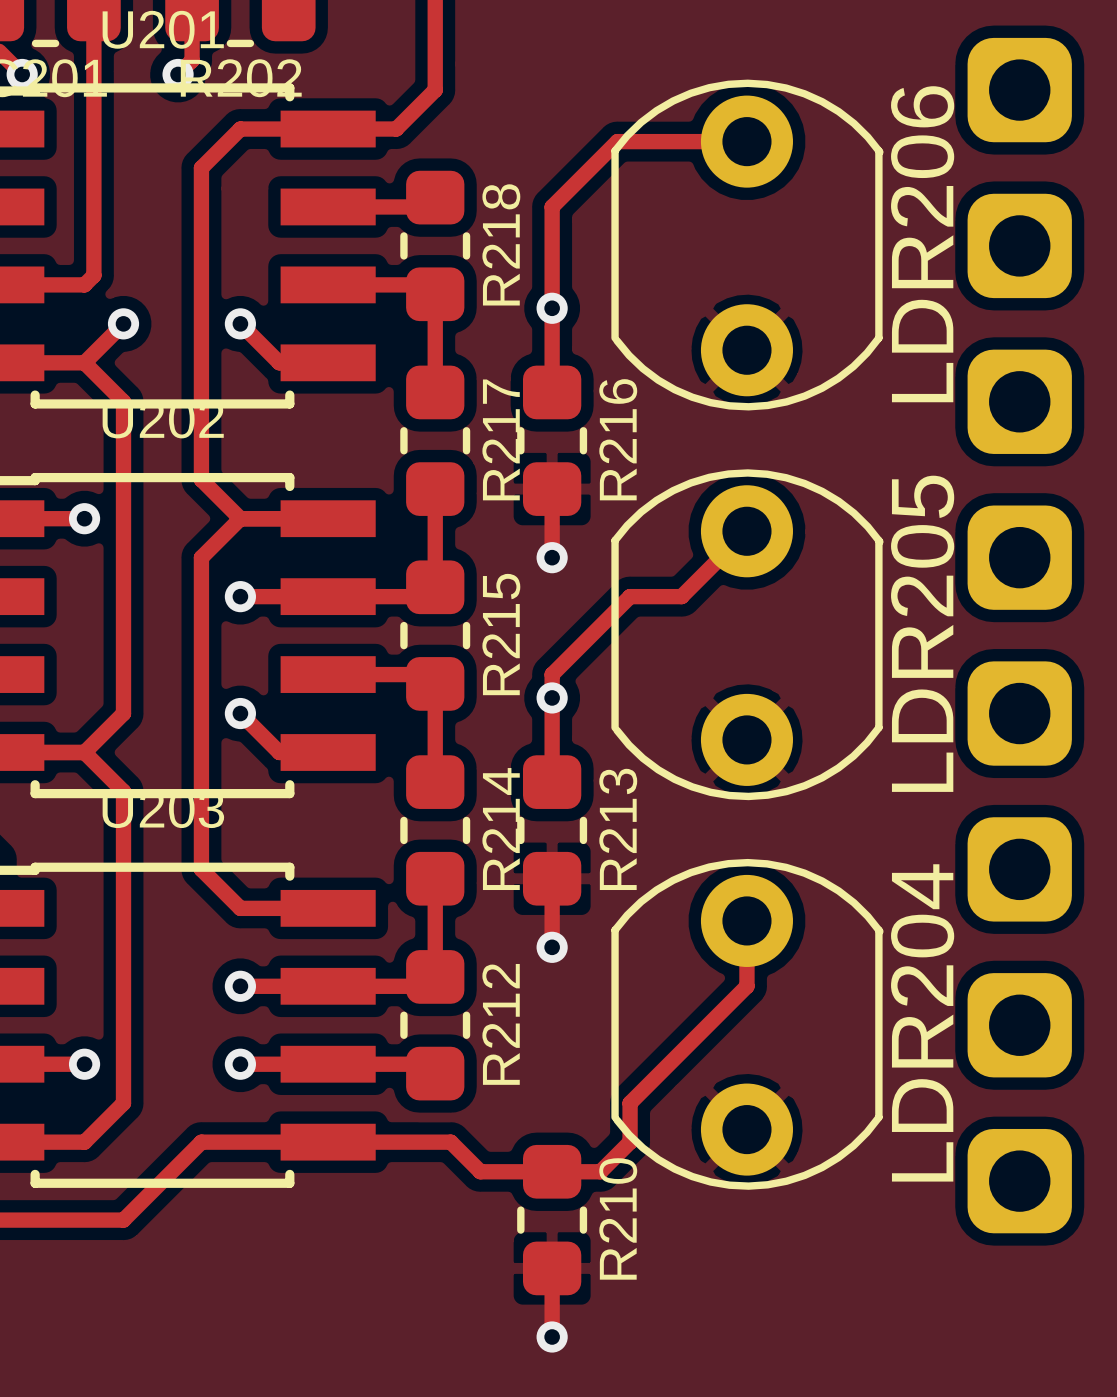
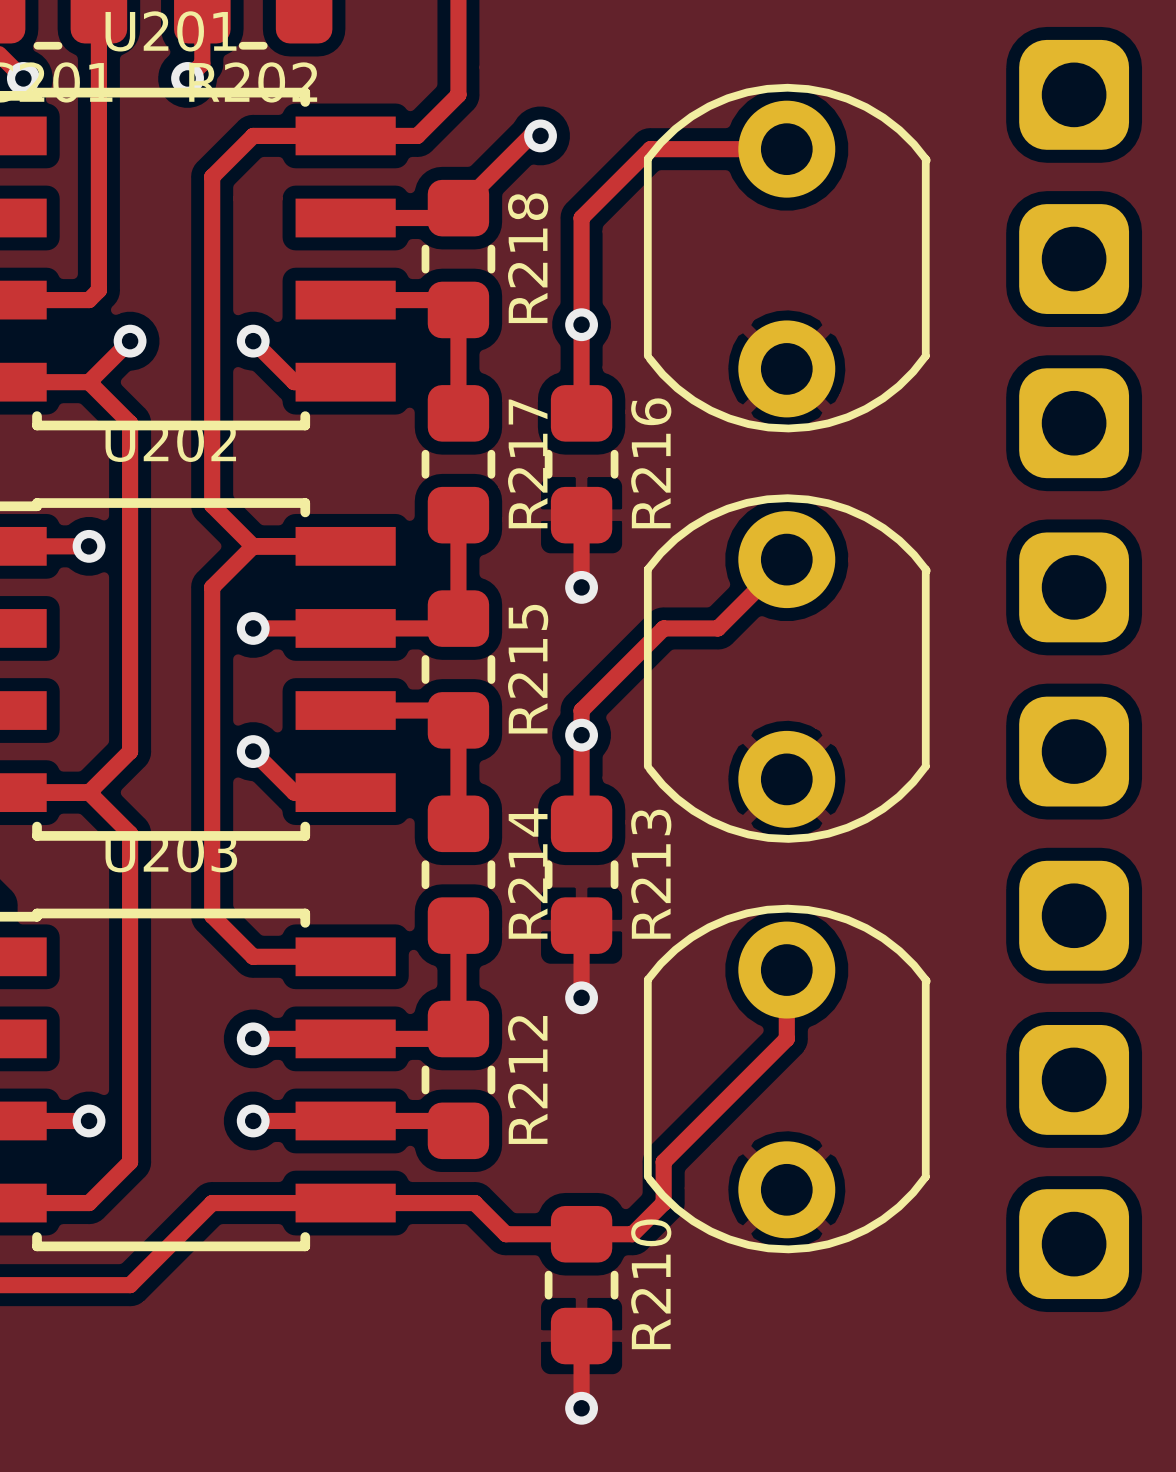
track: none -> (540, 135) (530, 135) (458, 208)
via: none -> (540, 135)
LDR206 name: LDR206 (922, 244) -> none
LDR205 name: LDR205 (922, 633) -> none
LDR204 name: LDR204 (922, 1022) -> none

